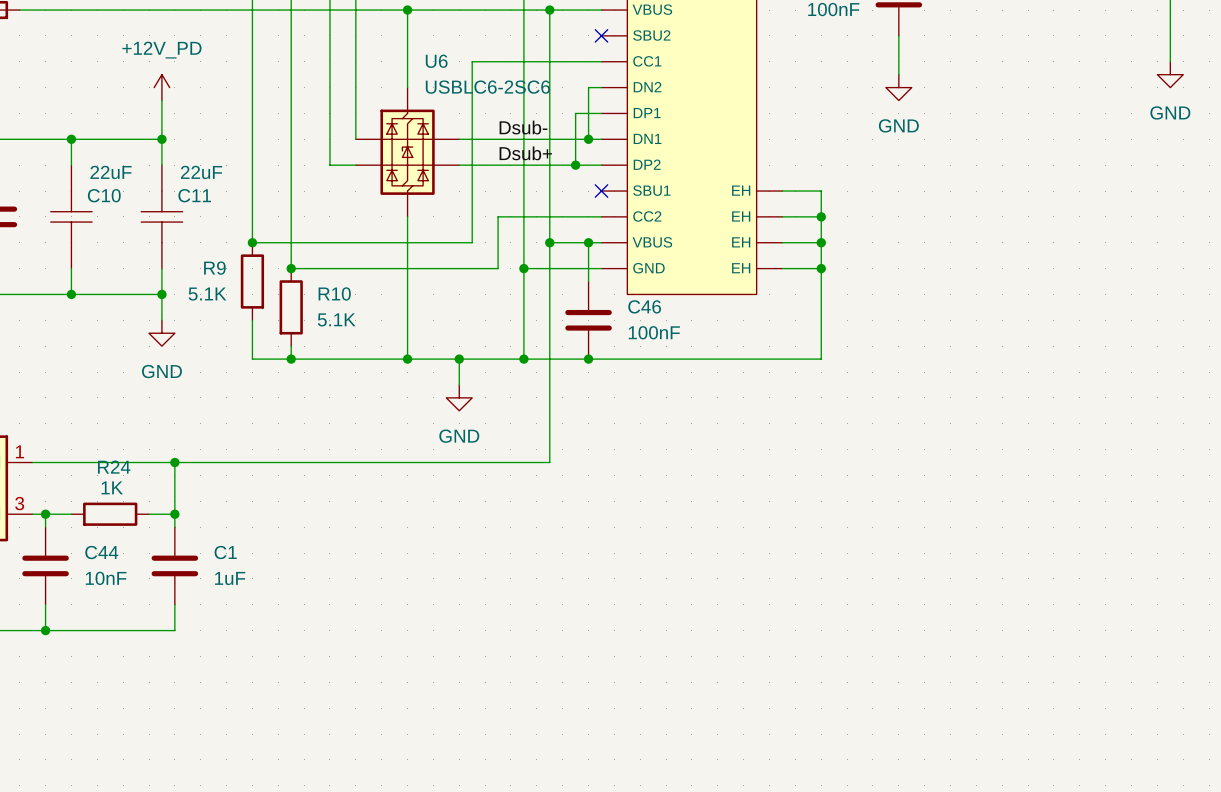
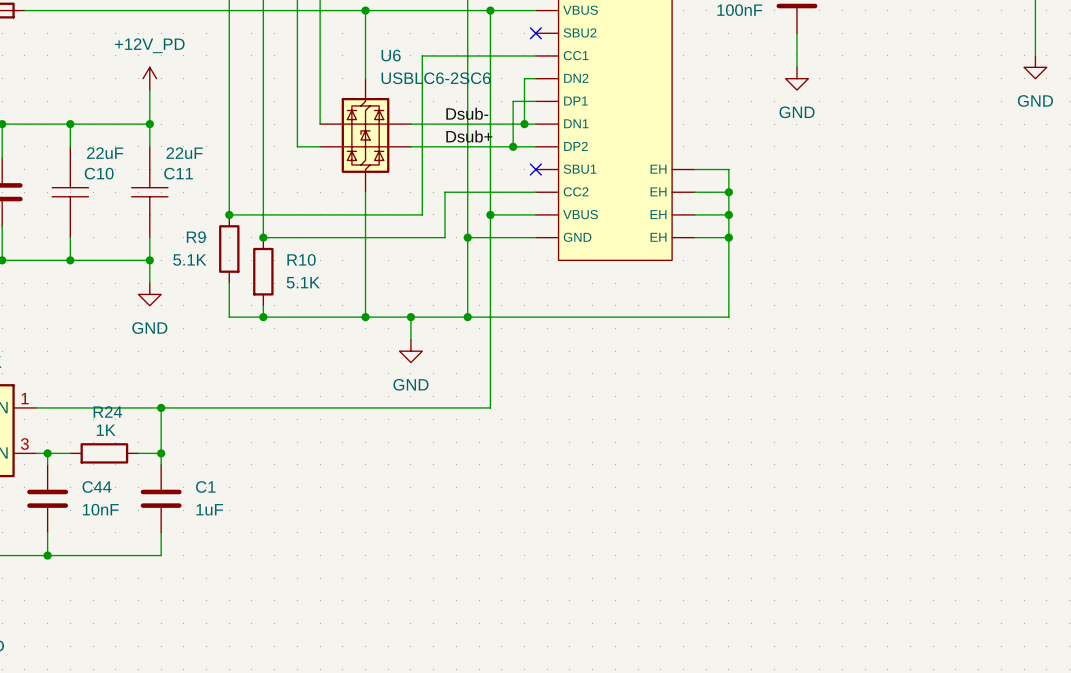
wire: (588, 242) (588, 281) -> none
junction: (588, 242) -> none
C46: 100nF (588, 320) -> none
junction: (588, 359) -> none

